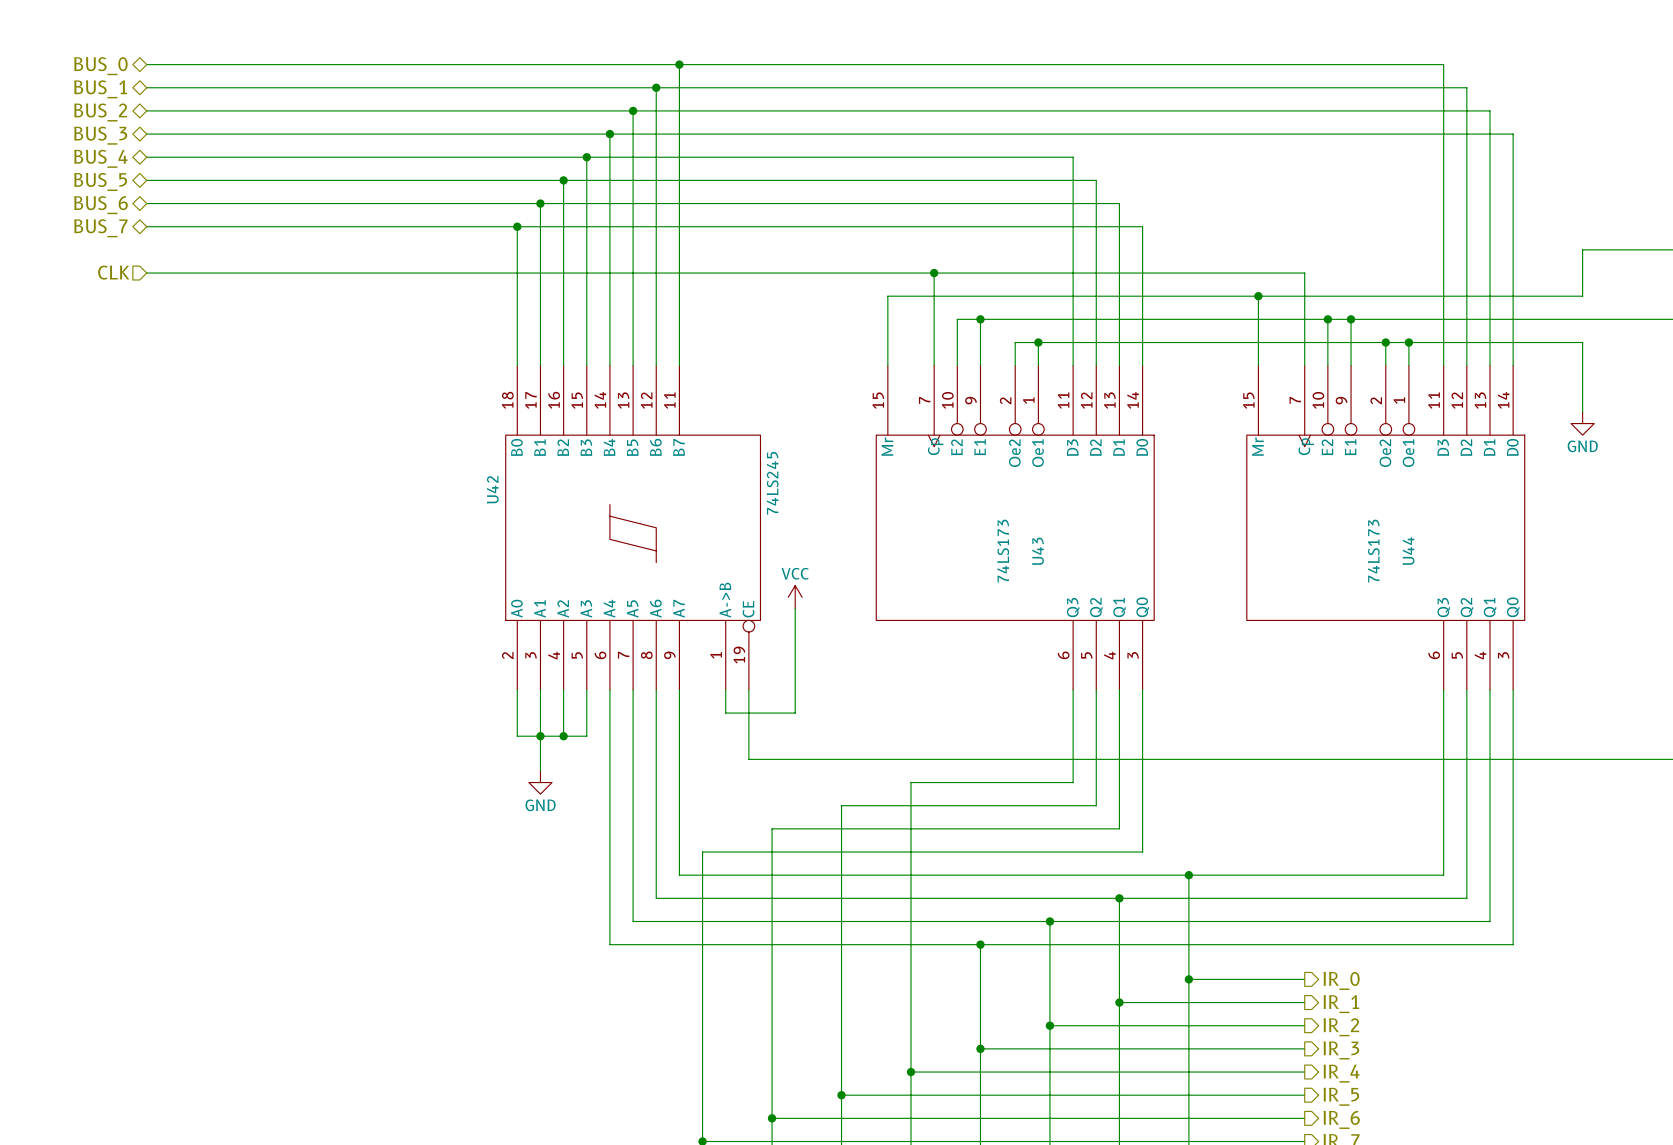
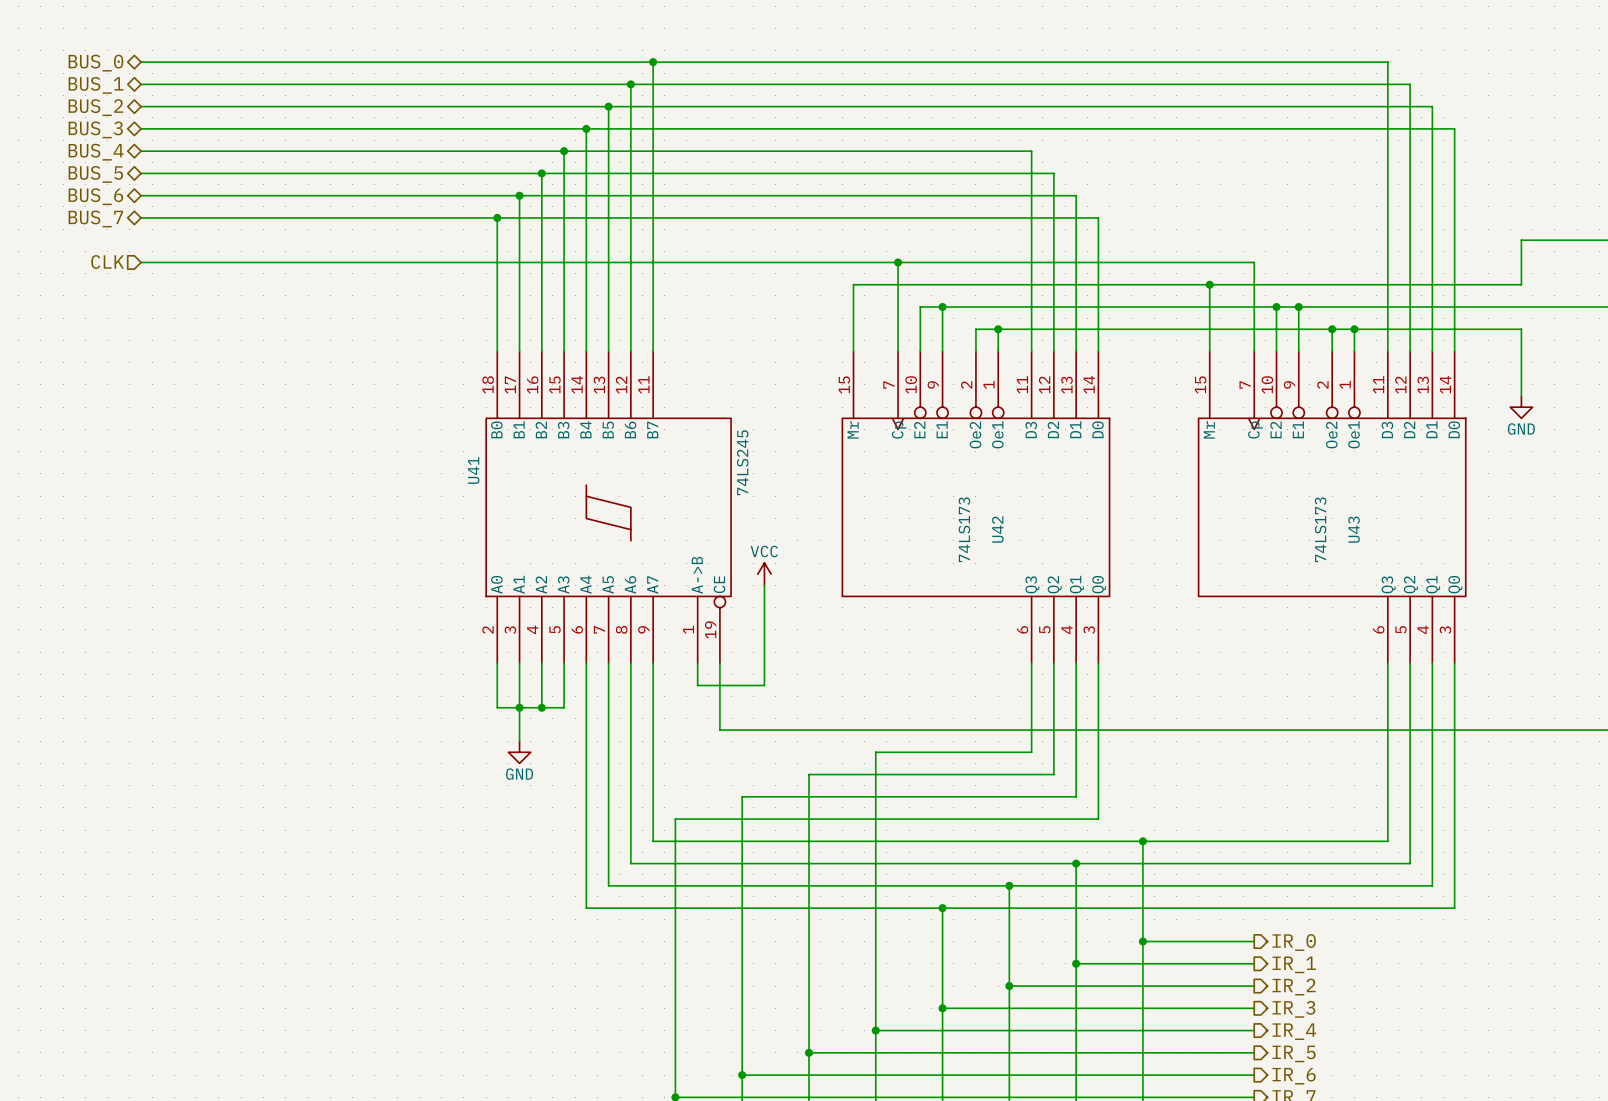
U42 name: U42 (492, 489) -> U41 (473, 470)
U43 name: U43 (1038, 551) -> U42 (997, 529)
U44 name: U44 (1408, 551) -> U43 (1354, 529)

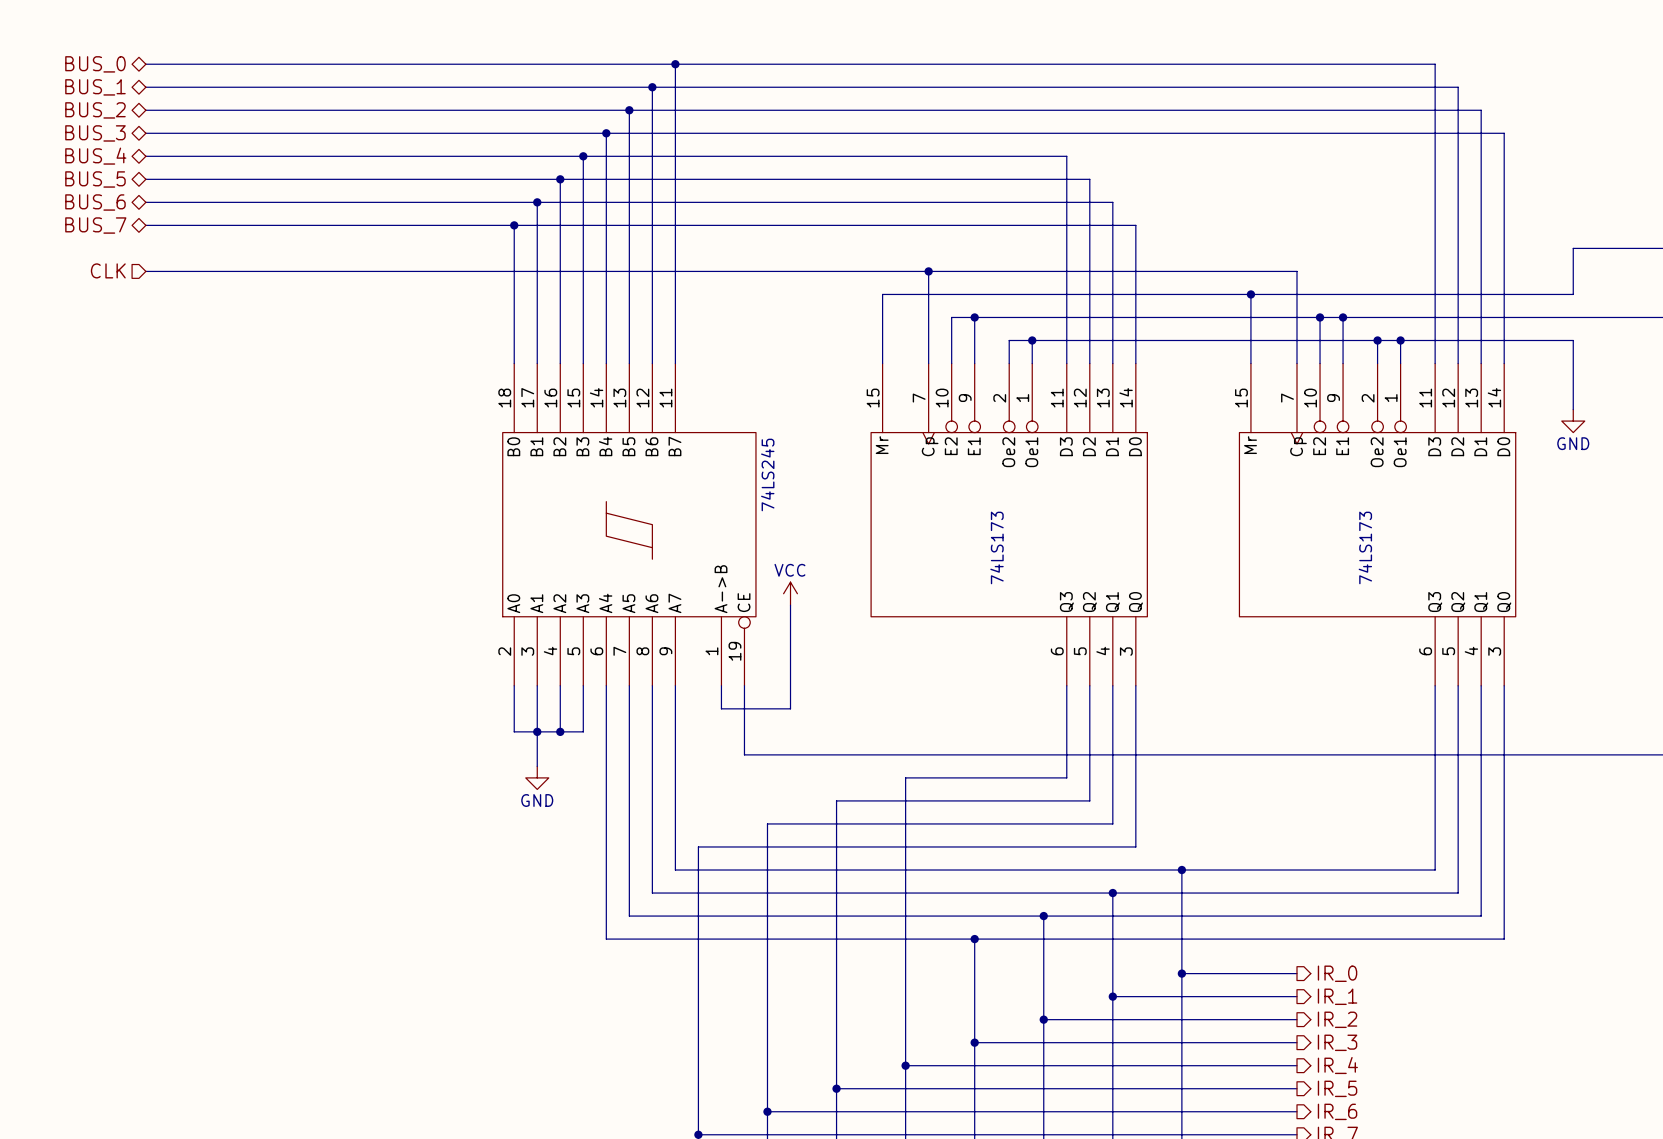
U41 name: U41 (473, 470) -> none
U42 name: U42 (997, 529) -> none
U43 name: U43 (1354, 529) -> none

